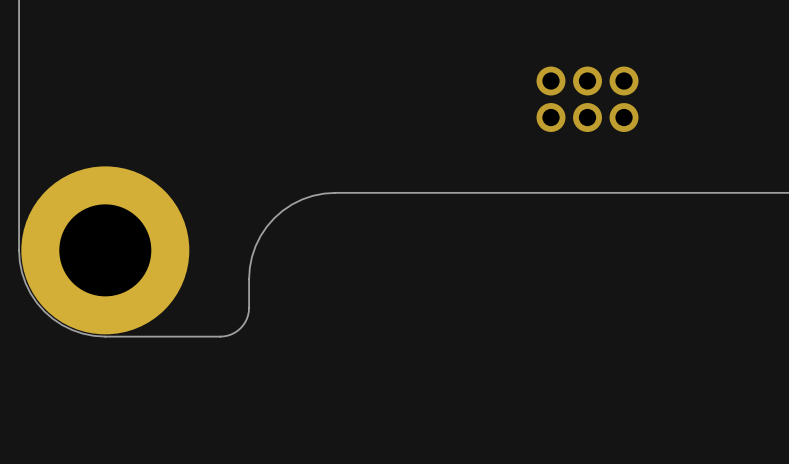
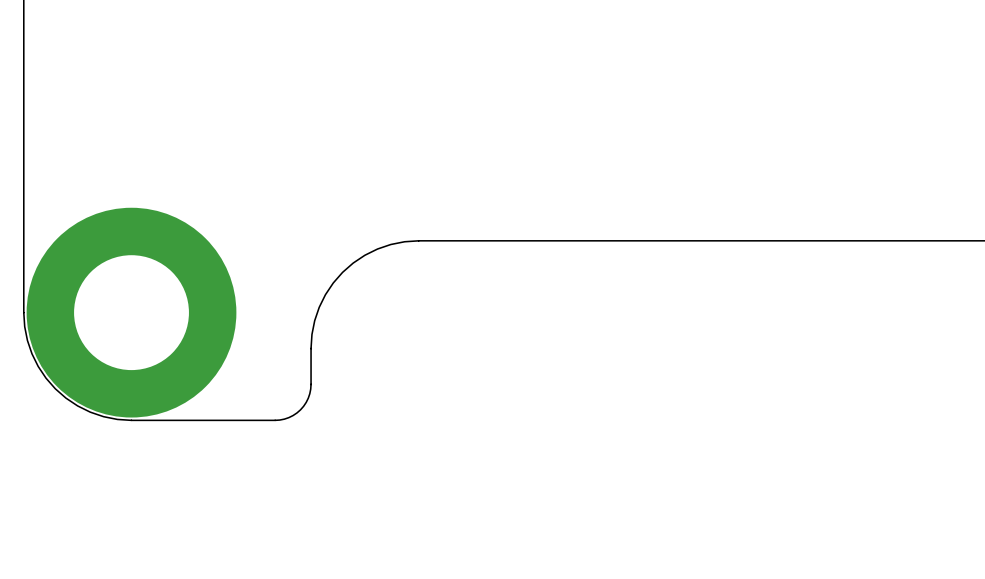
via: (551, 81) -> none
via: (587, 81) -> none
via: (624, 81) -> none
via: (551, 117) -> none
via: (587, 117) -> none
via: (624, 117) -> none

